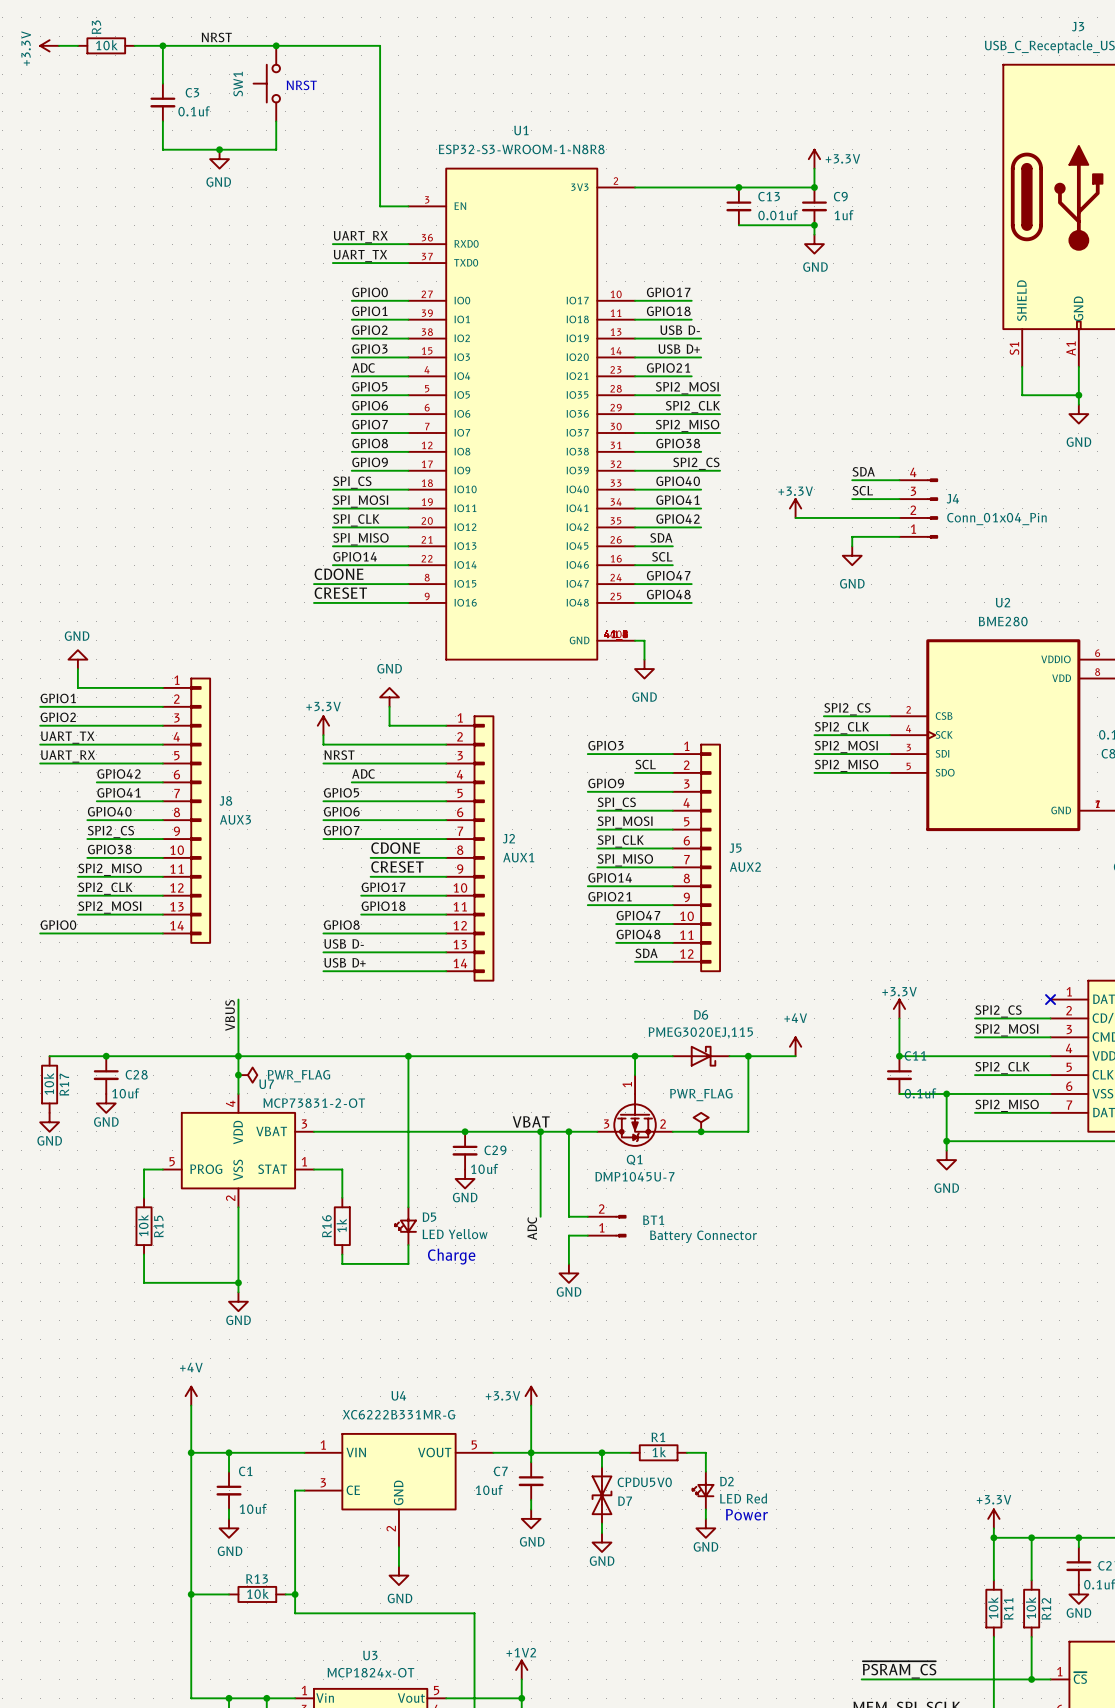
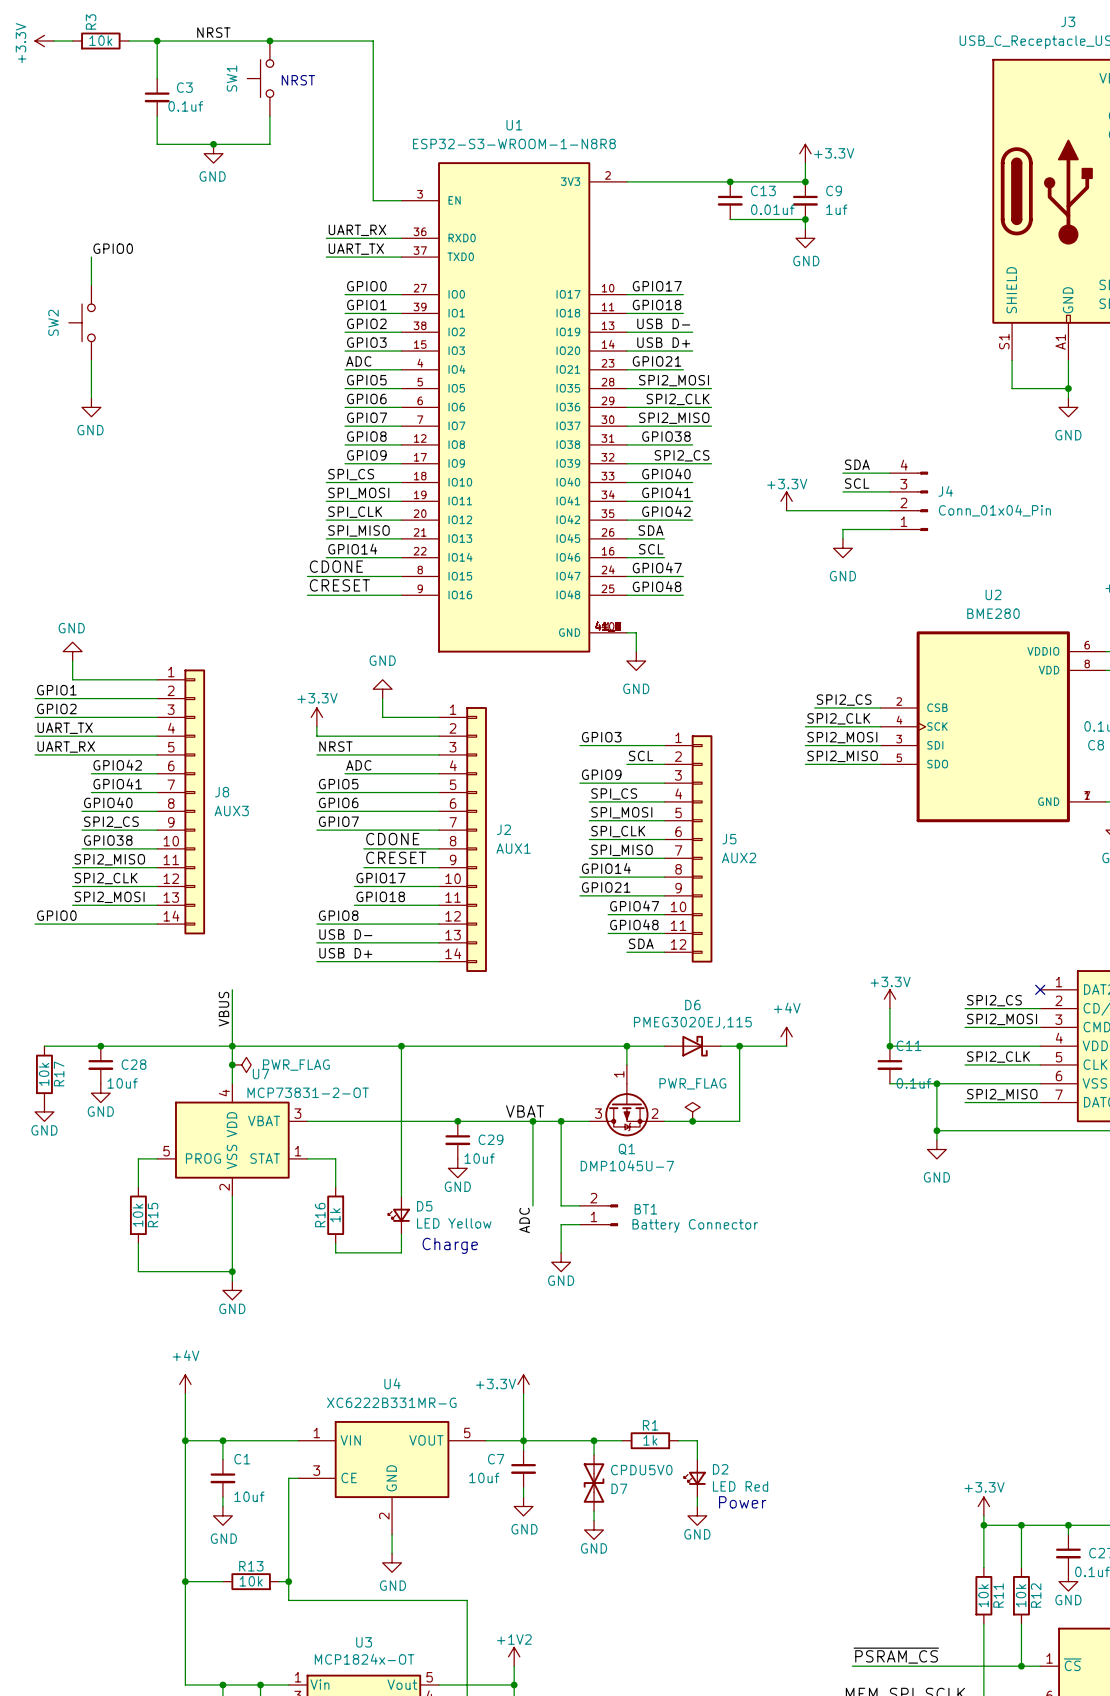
label: none -> GPIO0 (113, 248)
wire: none -> (91, 257) (91, 285)
SW2: none -> (82, 322)
wire: none -> (91, 360) (91, 397)
power symbol: none -> GND (91, 407)

